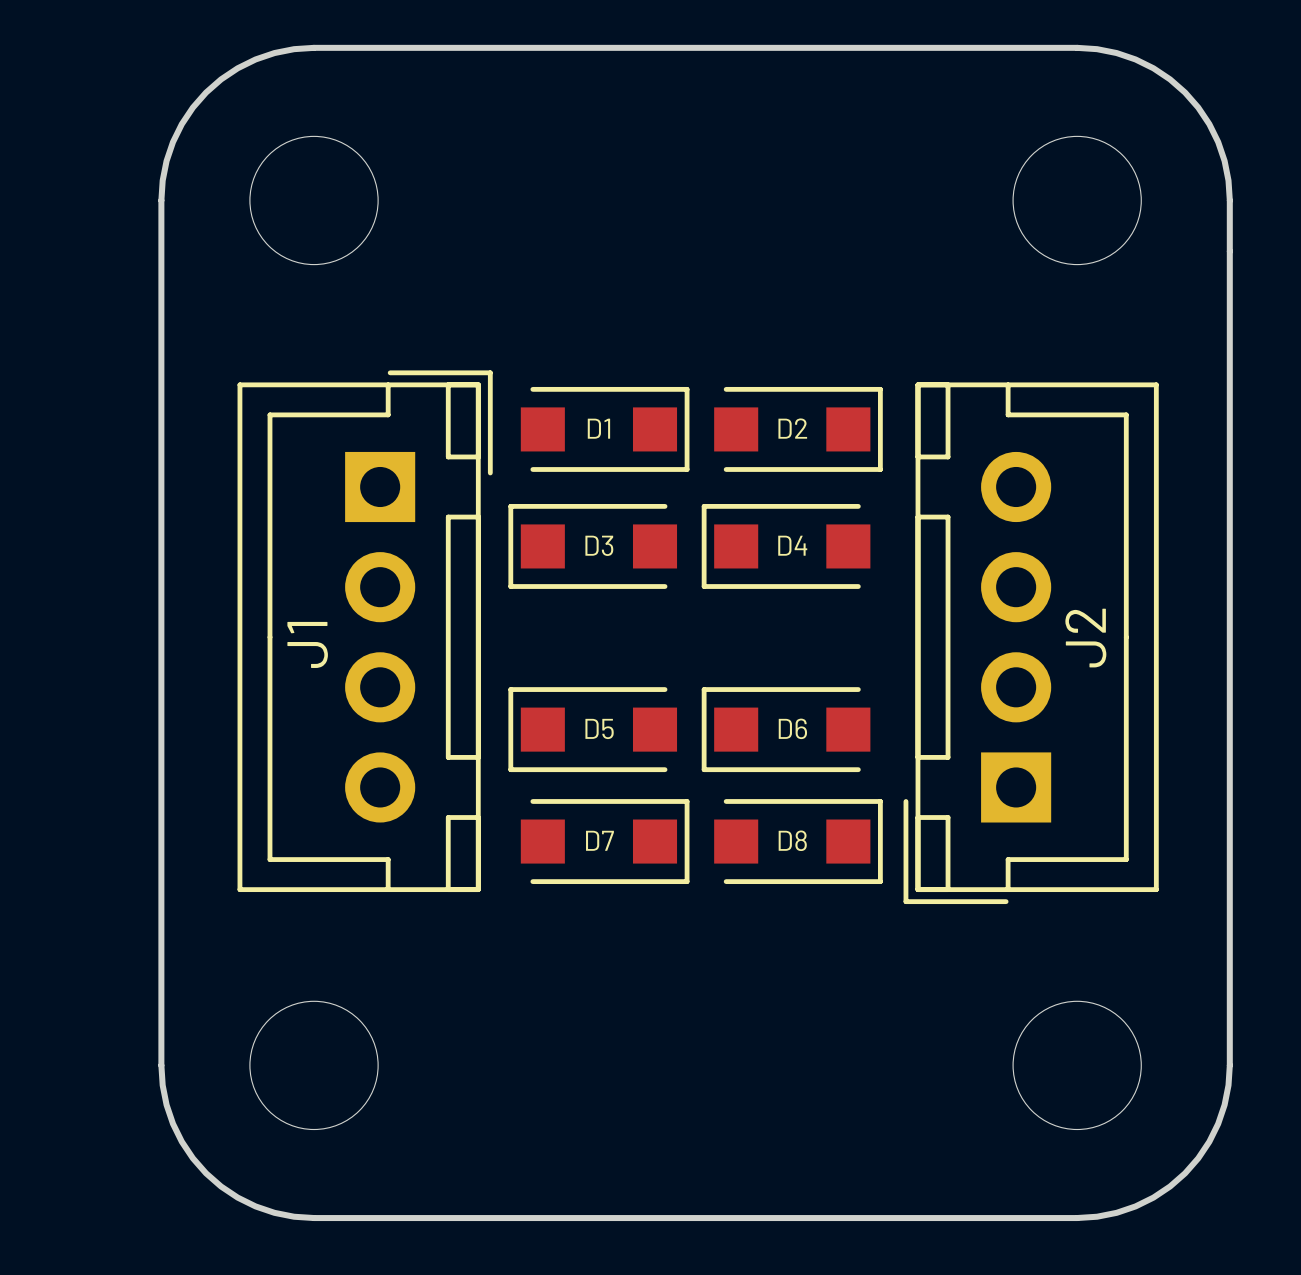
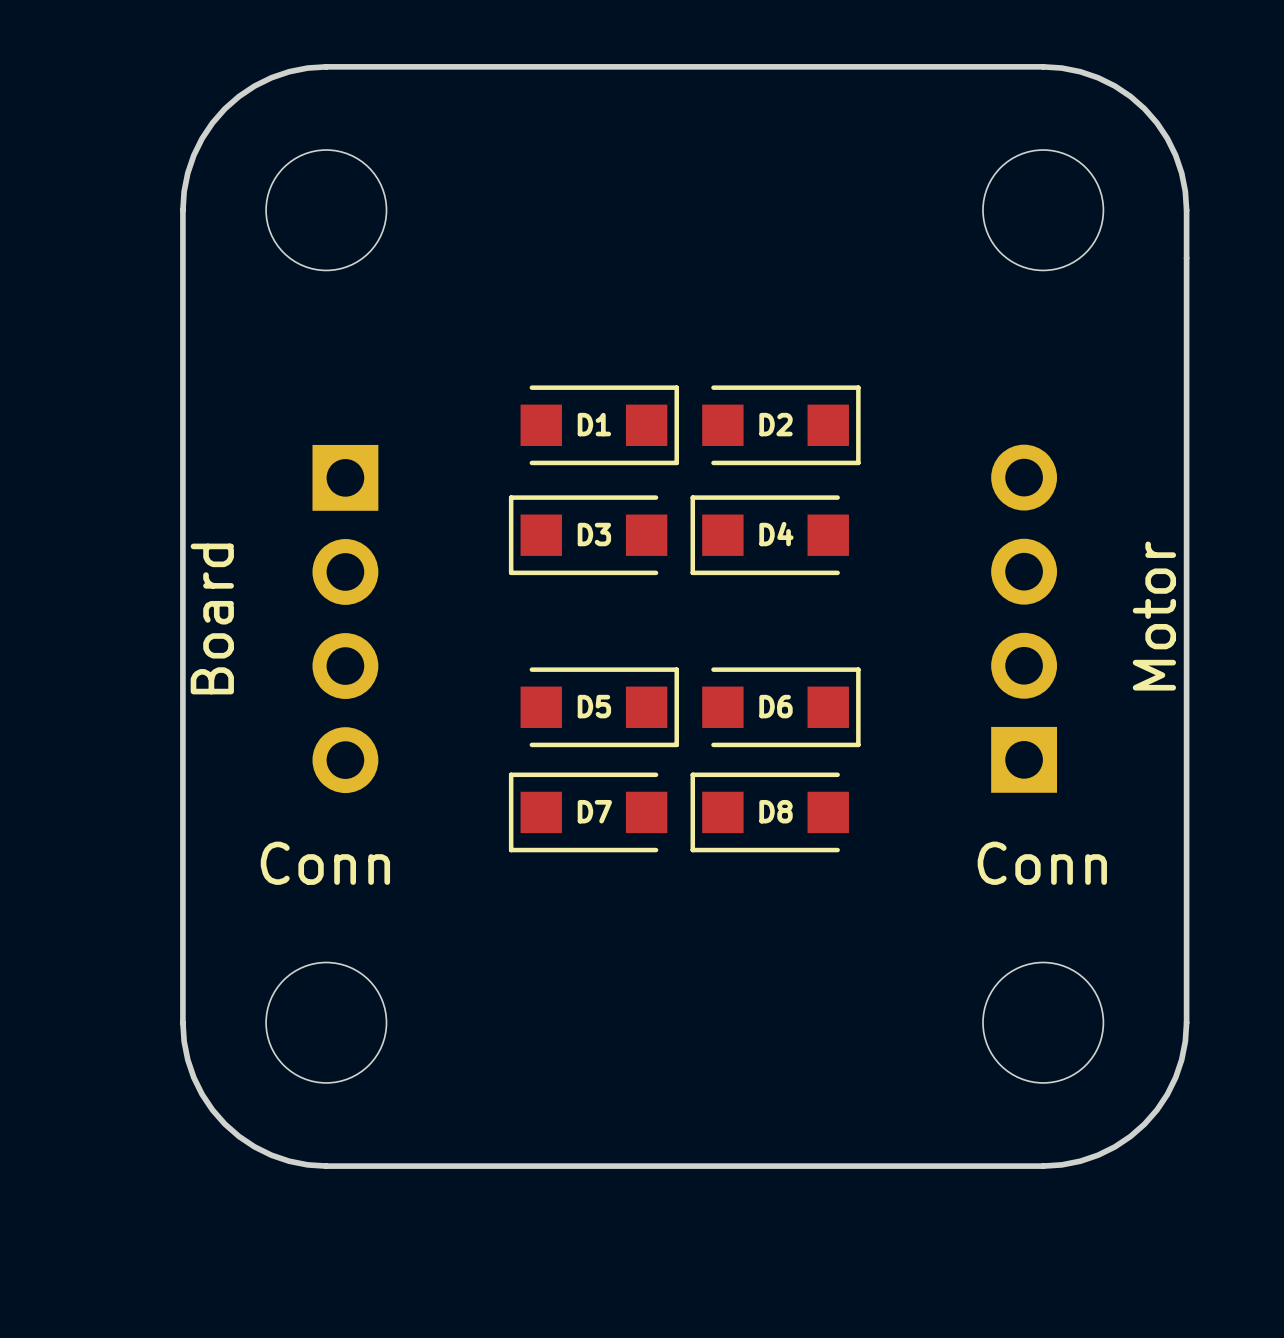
J1 side: top (365, 631) -> bottom (345, 618)
J2 name: J2 (1085, 638) -> Motor (1154, 616)
J2 side: top (1031, 643) -> bottom (1024, 618)
J1 name: J1 (307, 644) -> Board (212, 618)
D5 rotation: 0° (592, 729) -> 180° (599, 707)
D6 rotation: 0° (786, 729) -> 180° (781, 707)
D7 rotation: 0° (605, 841) -> 180° (588, 812)
D8 rotation: 0° (798, 841) -> 180° (769, 812)
Conn name: none -> Conn (325, 863)
Conn name: none -> Conn (1042, 863)

